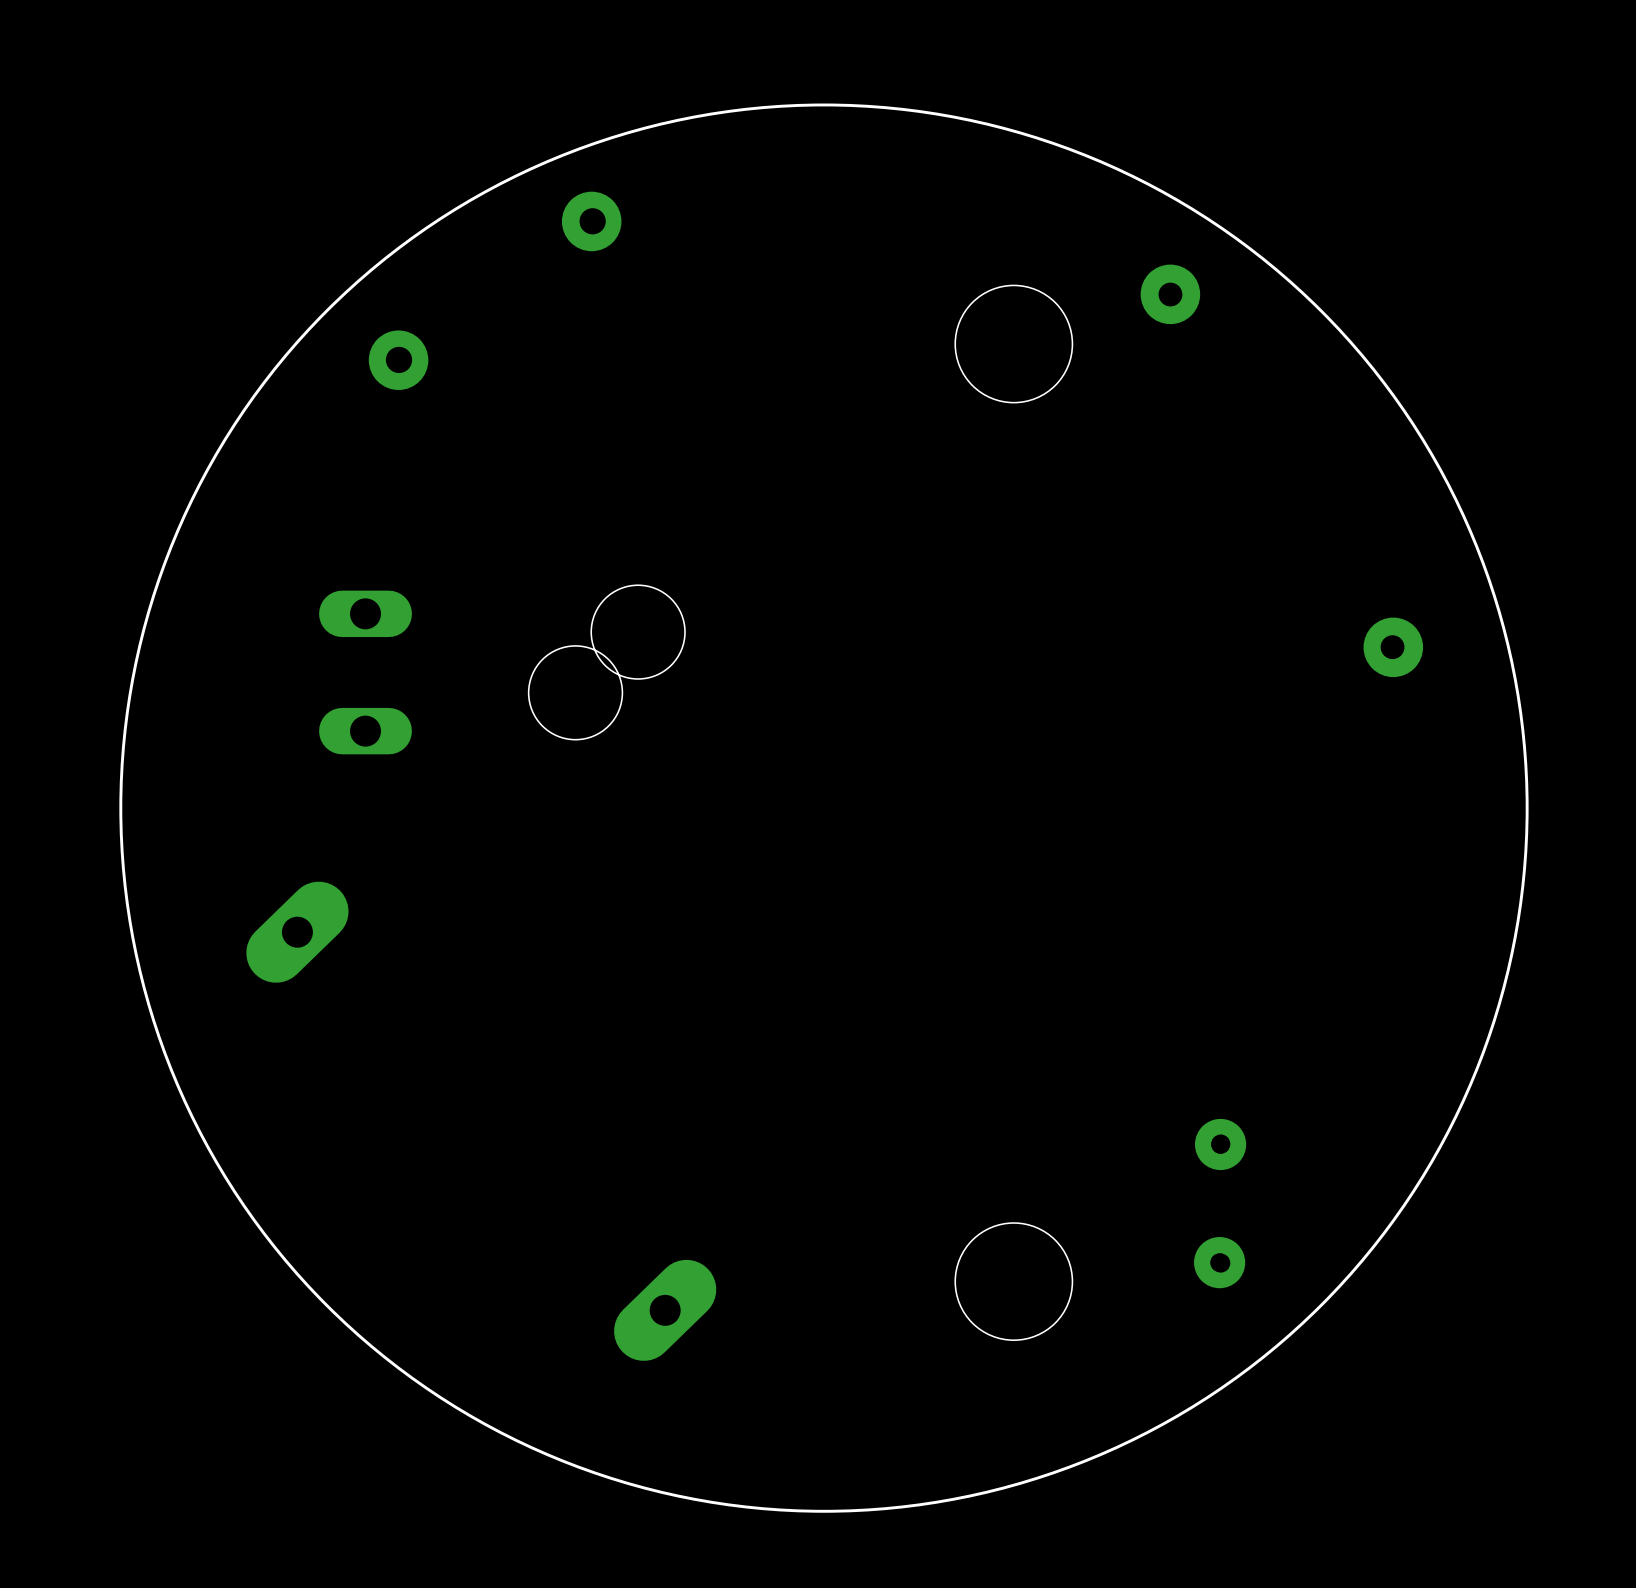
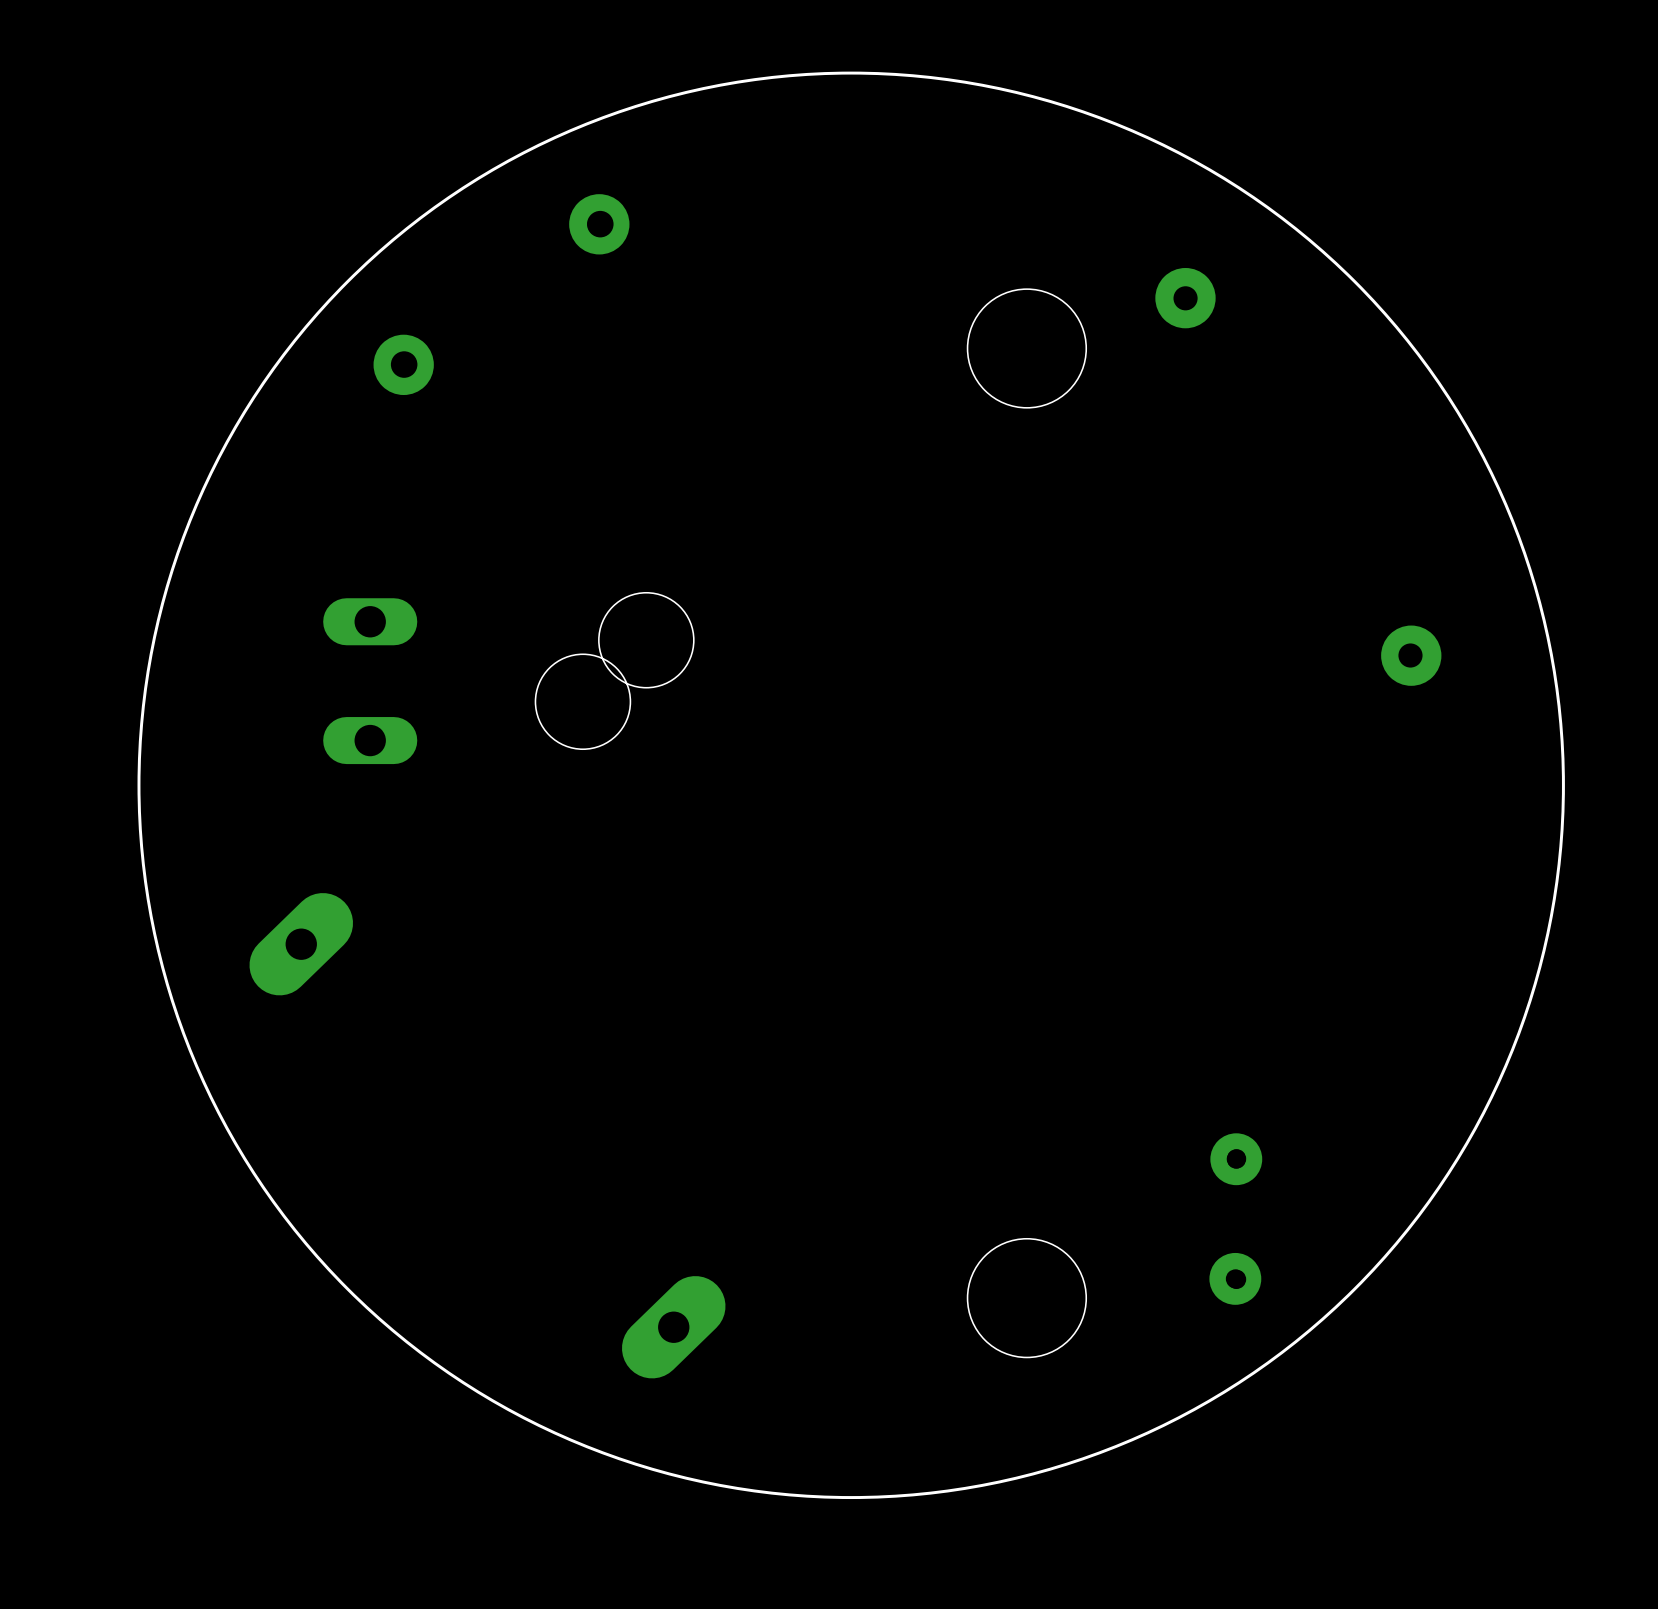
round board edge position: (823, 808) -> (851, 785)

